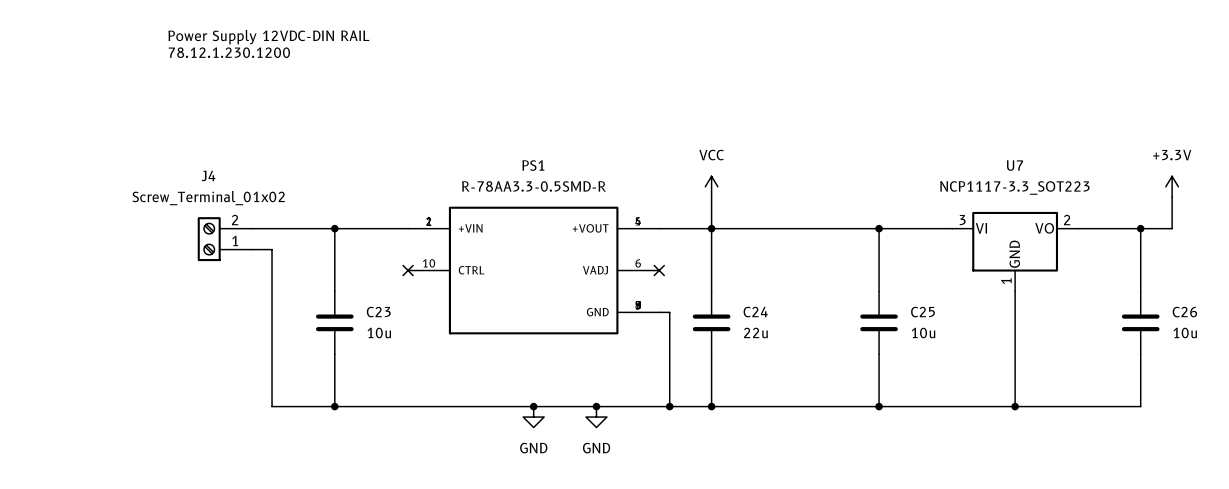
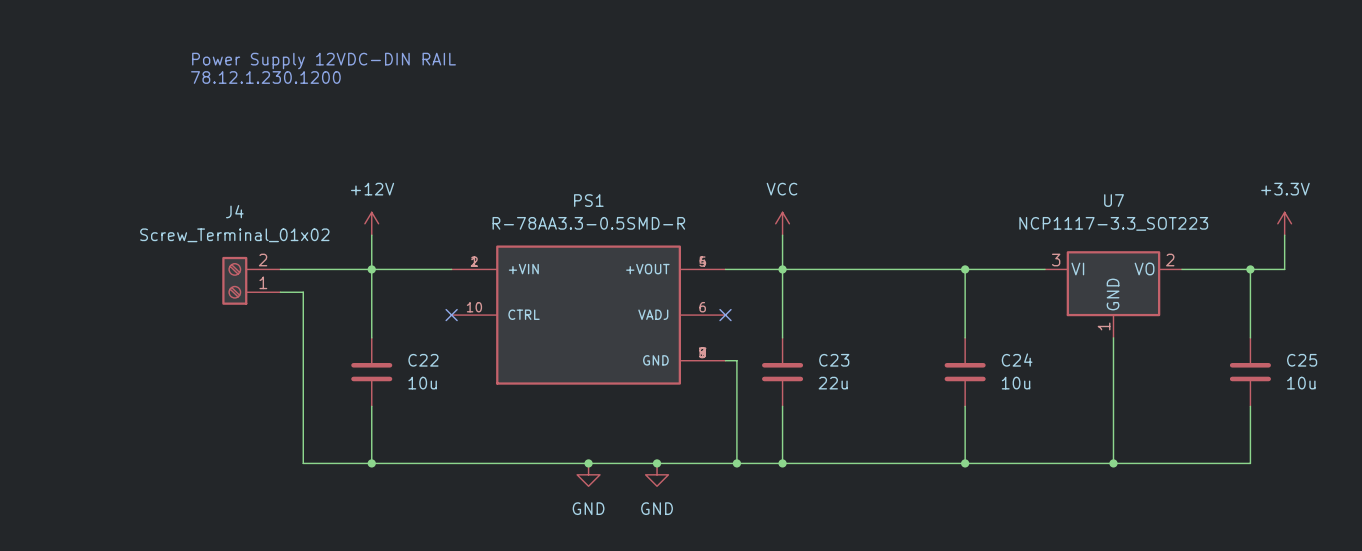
power symbol: none -> +12V (371, 223)
wire: none -> (371, 235) (371, 269)
C23 name: C23 (378, 312) -> C22 (423, 360)
C24 name: C24 (755, 312) -> C23 (834, 360)
C25 name: C25 (922, 312) -> C24 (1017, 360)
C26 name: C26 (1184, 312) -> C25 (1302, 360)

